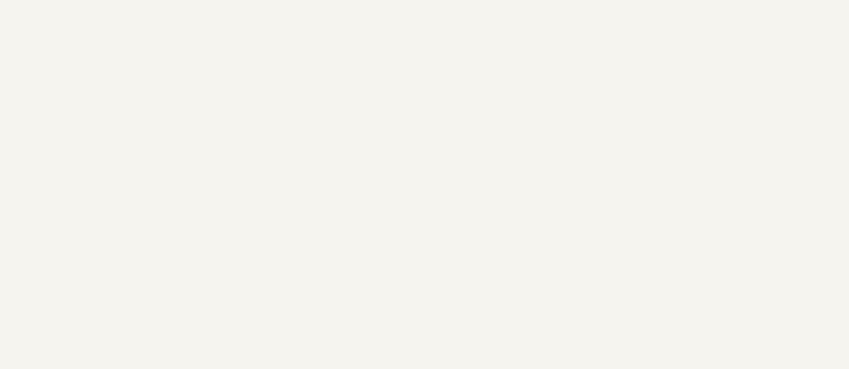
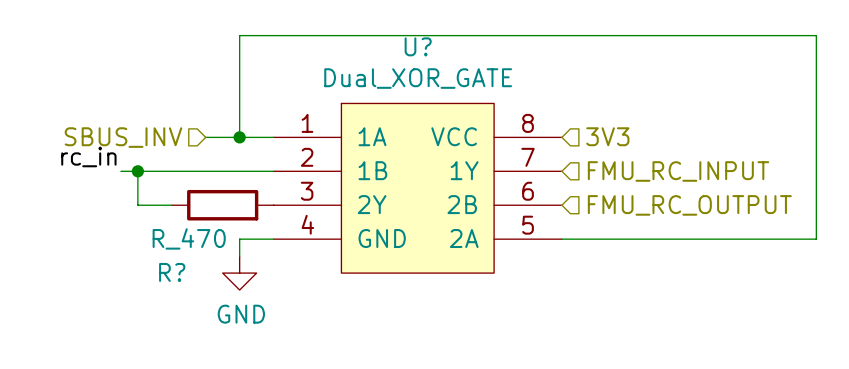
hierarchical label: none -> 3V3 (607, 136)
wire: none -> (205, 137) (273, 137)
wire: none -> (239, 137) (239, 35) (816, 35) (816, 239) (561, 239)
junction: none -> (239, 137)
hierarchical label: none -> SBUS_INV (123, 137)
label: none -> rc_in (88, 156)
wire: none -> (120, 171) (273, 171)
wire: none -> (137, 171) (137, 205) (171, 205)
junction: none -> (137, 171)
hierarchical label: none -> FMU_RC_INPUT (678, 171)
U?: none -> Dual_XOR_GATE (417, 188)
R?: none -> R_470 (222, 205)
hierarchical label: none -> FMU_RC_OUTPUT (689, 205)
wire: none -> (273, 239) (239, 239) (239, 256)
power symbol: none -> GND (239, 273)

